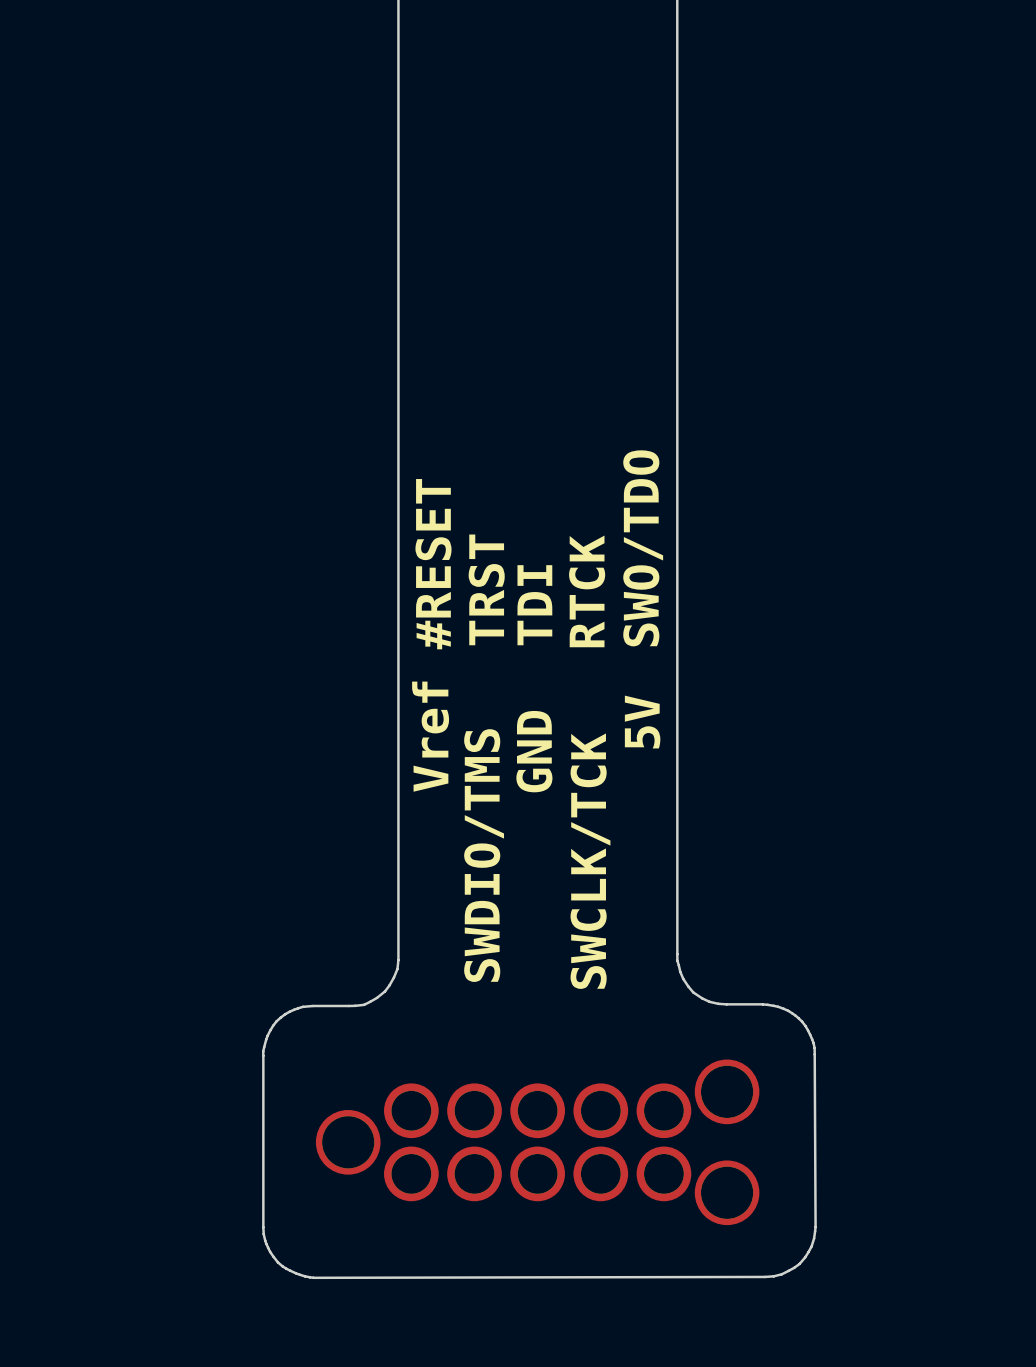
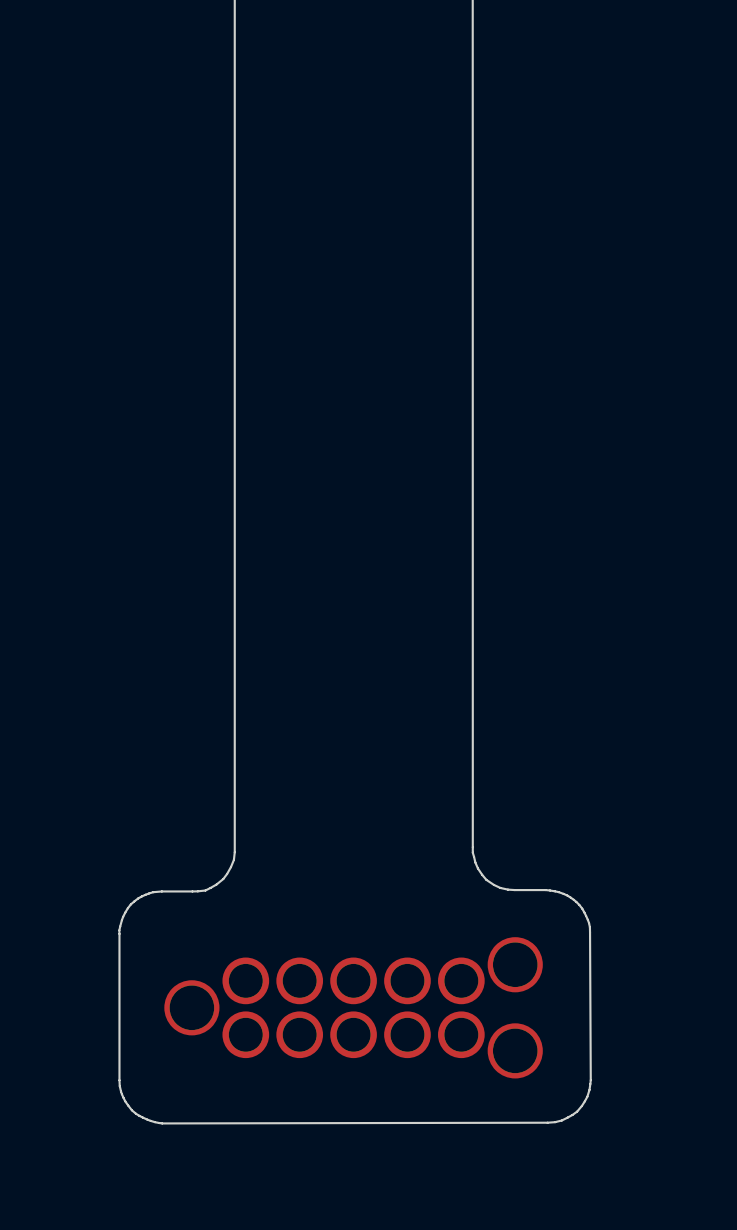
text: SWO/TDO (643, 548) -> none
text: #RESET (433, 564) -> none
text: TRST (486, 589) -> none
text: RTCK (587, 591) -> none
text: TDI (534, 605) -> none
text: 5V (642, 722) -> none
text: Vref (430, 736) -> none
text: GND (534, 751) -> none
text: SWDIO/TMS (484, 855) -> none
text: SWCLK/TCK (590, 861) -> none

